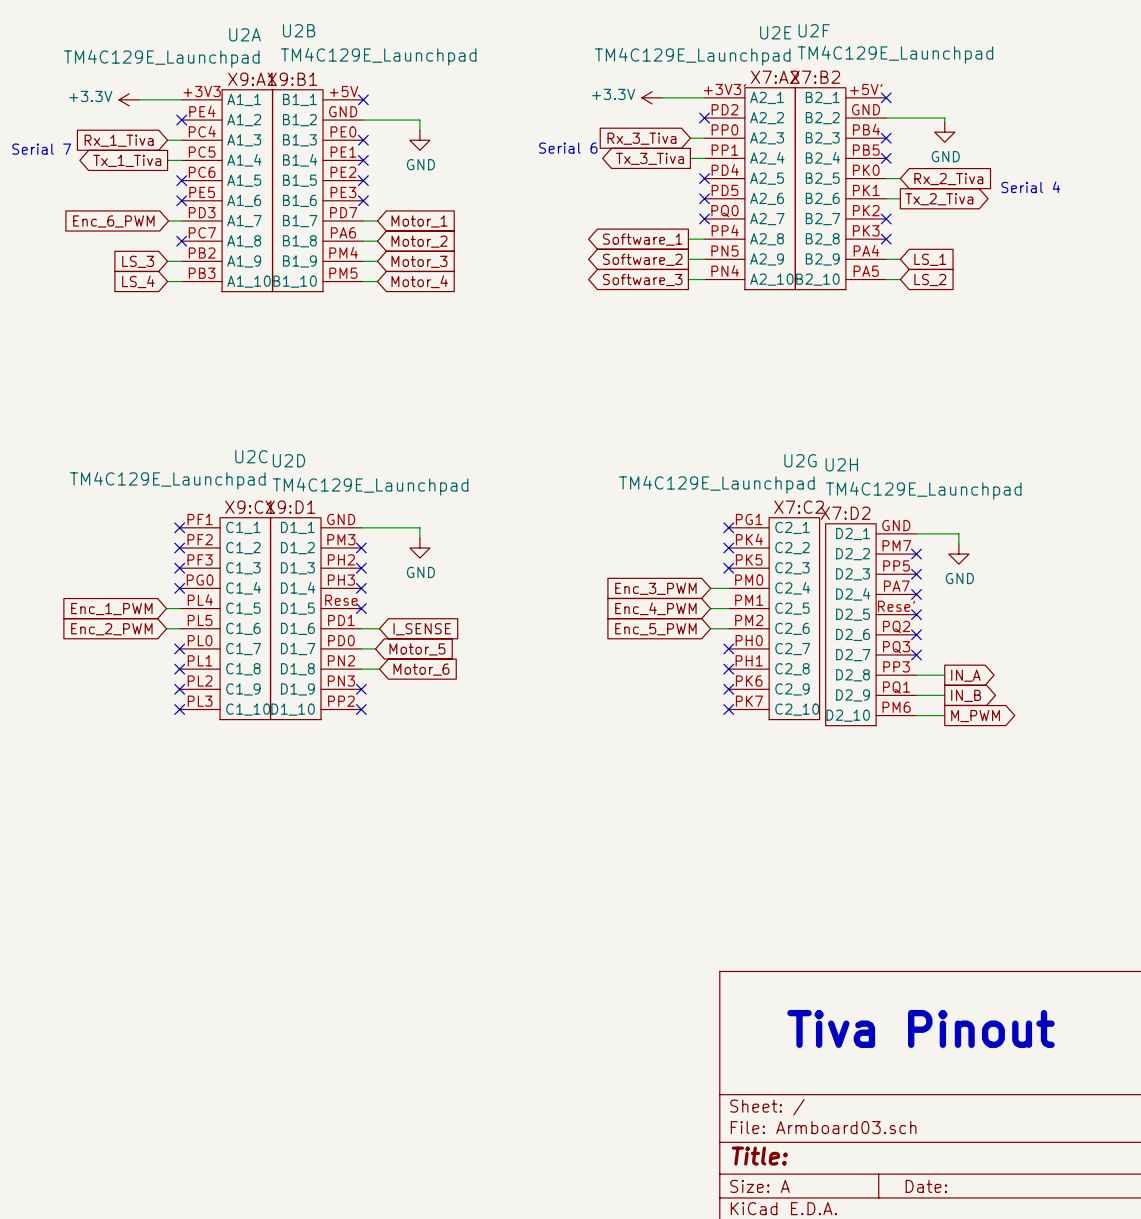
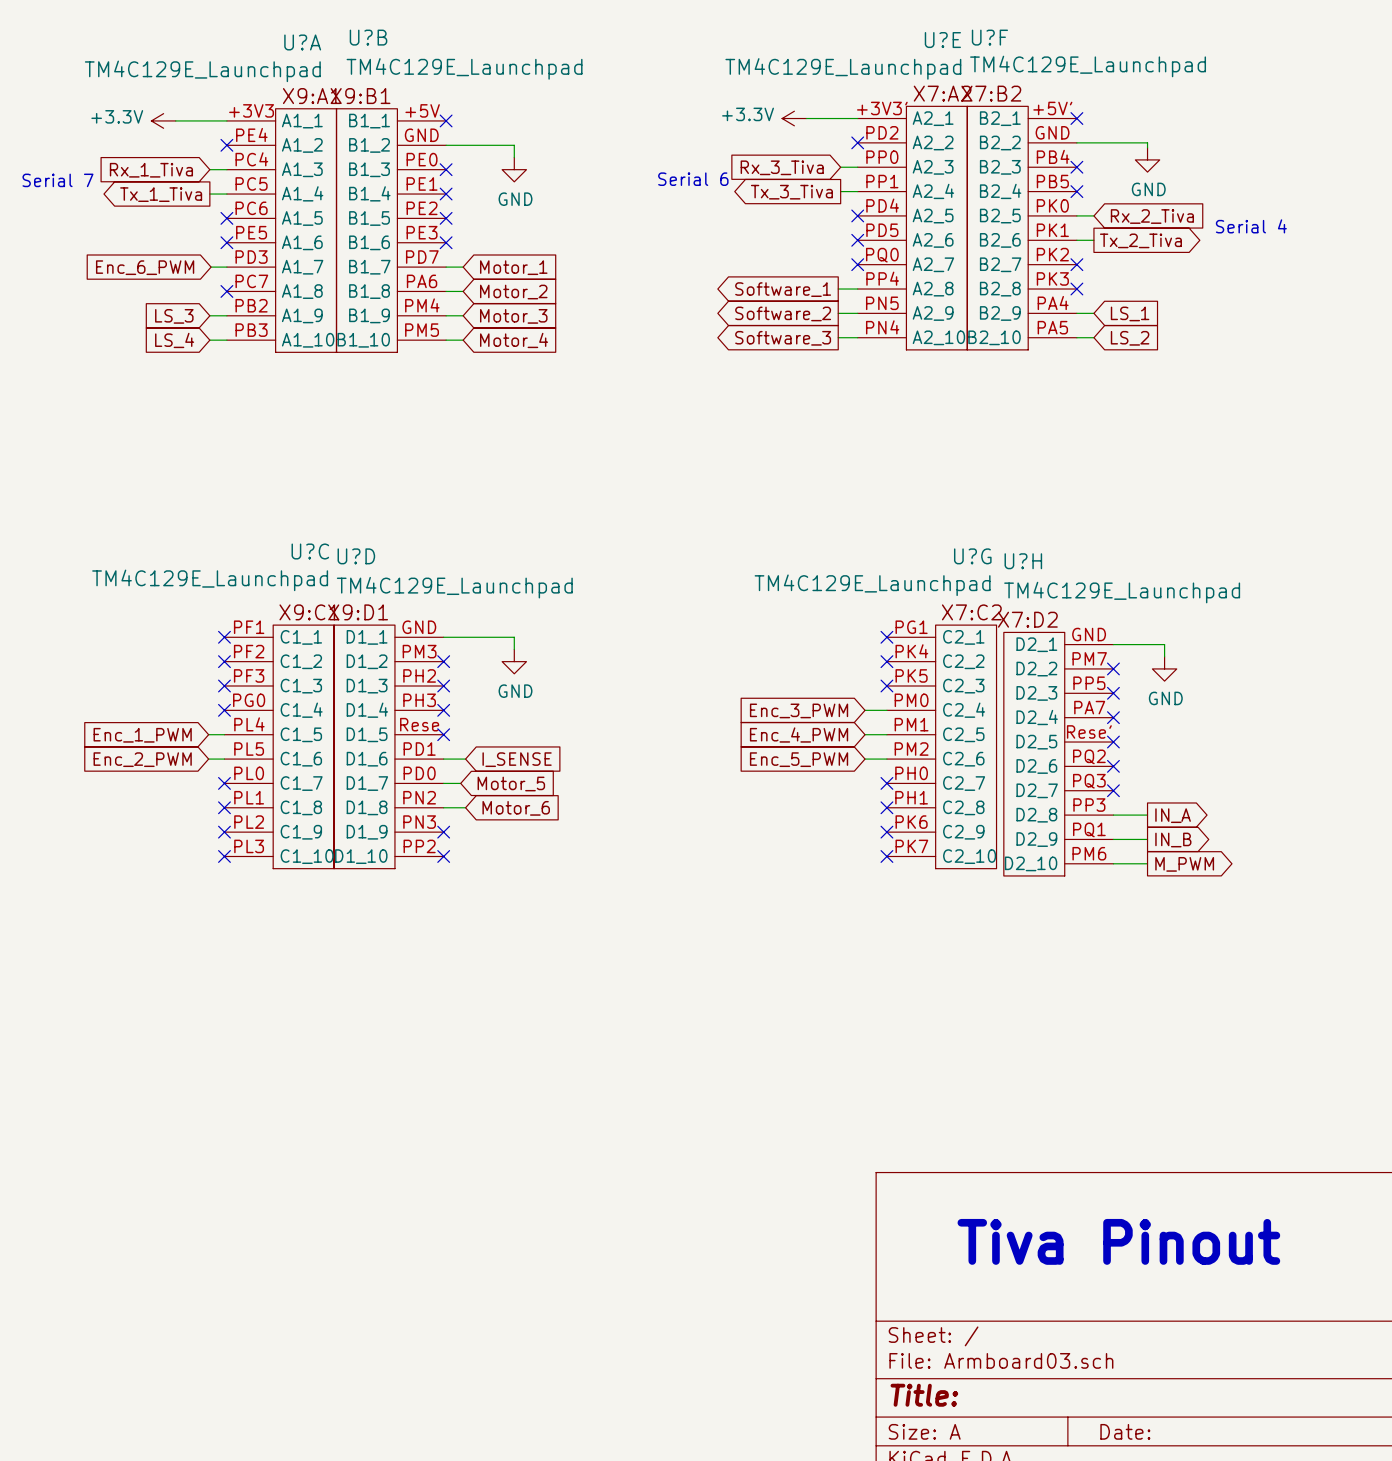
U2B name: U2B (299, 30) -> U?B (368, 37)
U2F name: U2F (814, 30) -> U?F (989, 37)
U2E name: U2E (775, 32) -> U?E (942, 40)
U2A name: U2A (245, 34) -> U?A (302, 42)
U2C name: U2C (251, 456) -> U?C (310, 551)
U2D name: U2D (288, 460) -> U?D (356, 556)
U2G name: U2G (800, 460) -> U?G (972, 556)
U2H name: U2H (841, 464) -> U?H (1023, 561)

